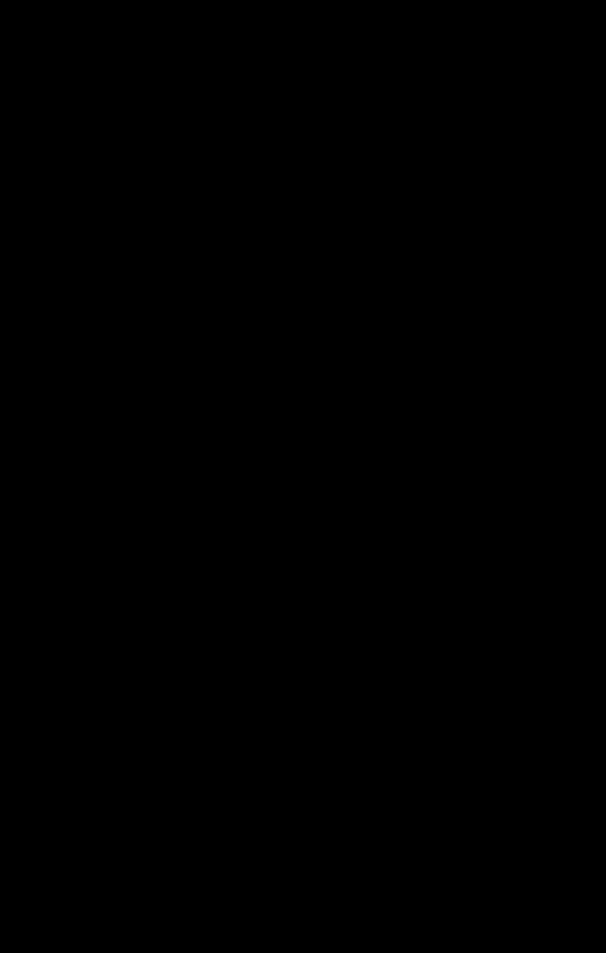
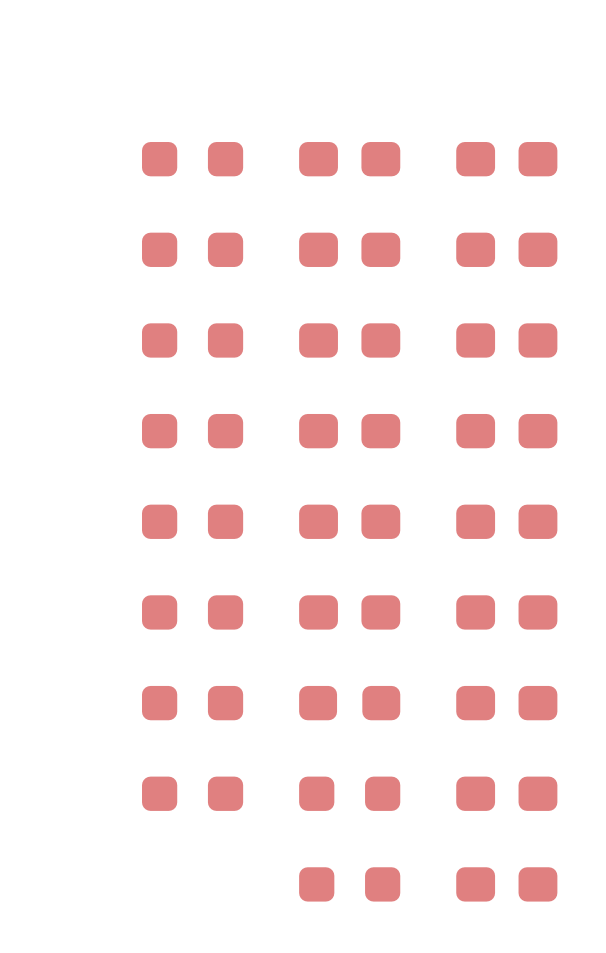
part: none -> (192, 159)
part: none -> (349, 159)
part: none -> (506, 159)
part: none -> (192, 249)
part: none -> (349, 249)
part: none -> (506, 249)
part: none -> (192, 340)
part: none -> (349, 340)
part: none -> (506, 340)
part: none -> (192, 431)
part: none -> (349, 431)
part: none -> (506, 431)
part: none -> (192, 521)
part: none -> (349, 521)
part: none -> (506, 521)
part: none -> (192, 612)
part: none -> (349, 612)
part: none -> (506, 612)
part: none -> (192, 703)
part: none -> (349, 703)
part: none -> (506, 703)
part: none -> (192, 793)
part: none -> (349, 793)
part: none -> (506, 793)
part: none -> (349, 884)
part: none -> (506, 884)

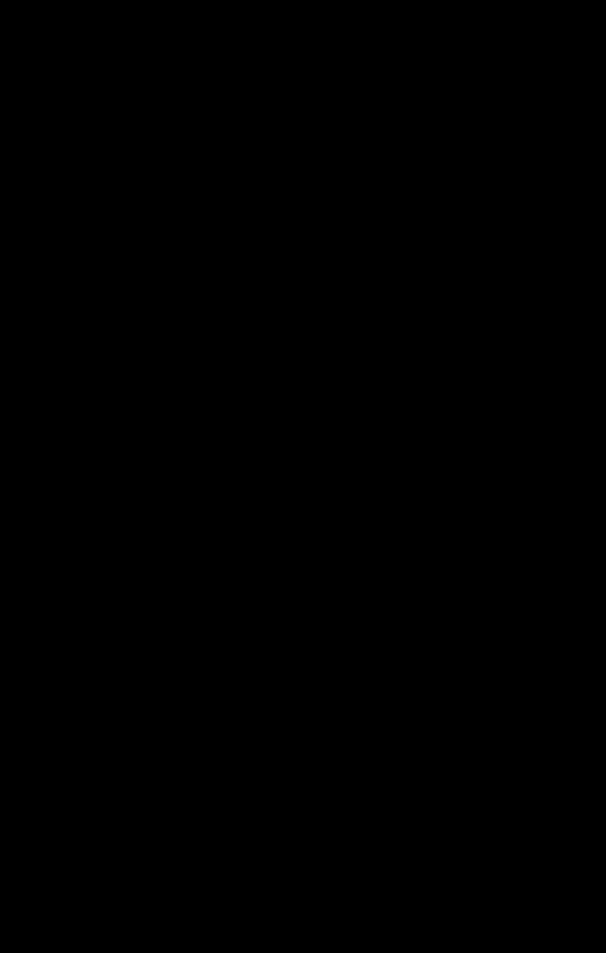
part: (192, 159) -> none
part: (349, 159) -> none
part: (506, 159) -> none
part: (192, 249) -> none
part: (349, 249) -> none
part: (506, 249) -> none
part: (192, 340) -> none
part: (349, 340) -> none
part: (506, 340) -> none
part: (192, 431) -> none
part: (349, 431) -> none
part: (506, 431) -> none
part: (192, 521) -> none
part: (349, 521) -> none
part: (506, 521) -> none
part: (192, 612) -> none
part: (349, 612) -> none
part: (506, 612) -> none
part: (192, 703) -> none
part: (349, 703) -> none
part: (506, 703) -> none
part: (192, 793) -> none
part: (349, 793) -> none
part: (506, 793) -> none
part: (349, 884) -> none
part: (506, 884) -> none

